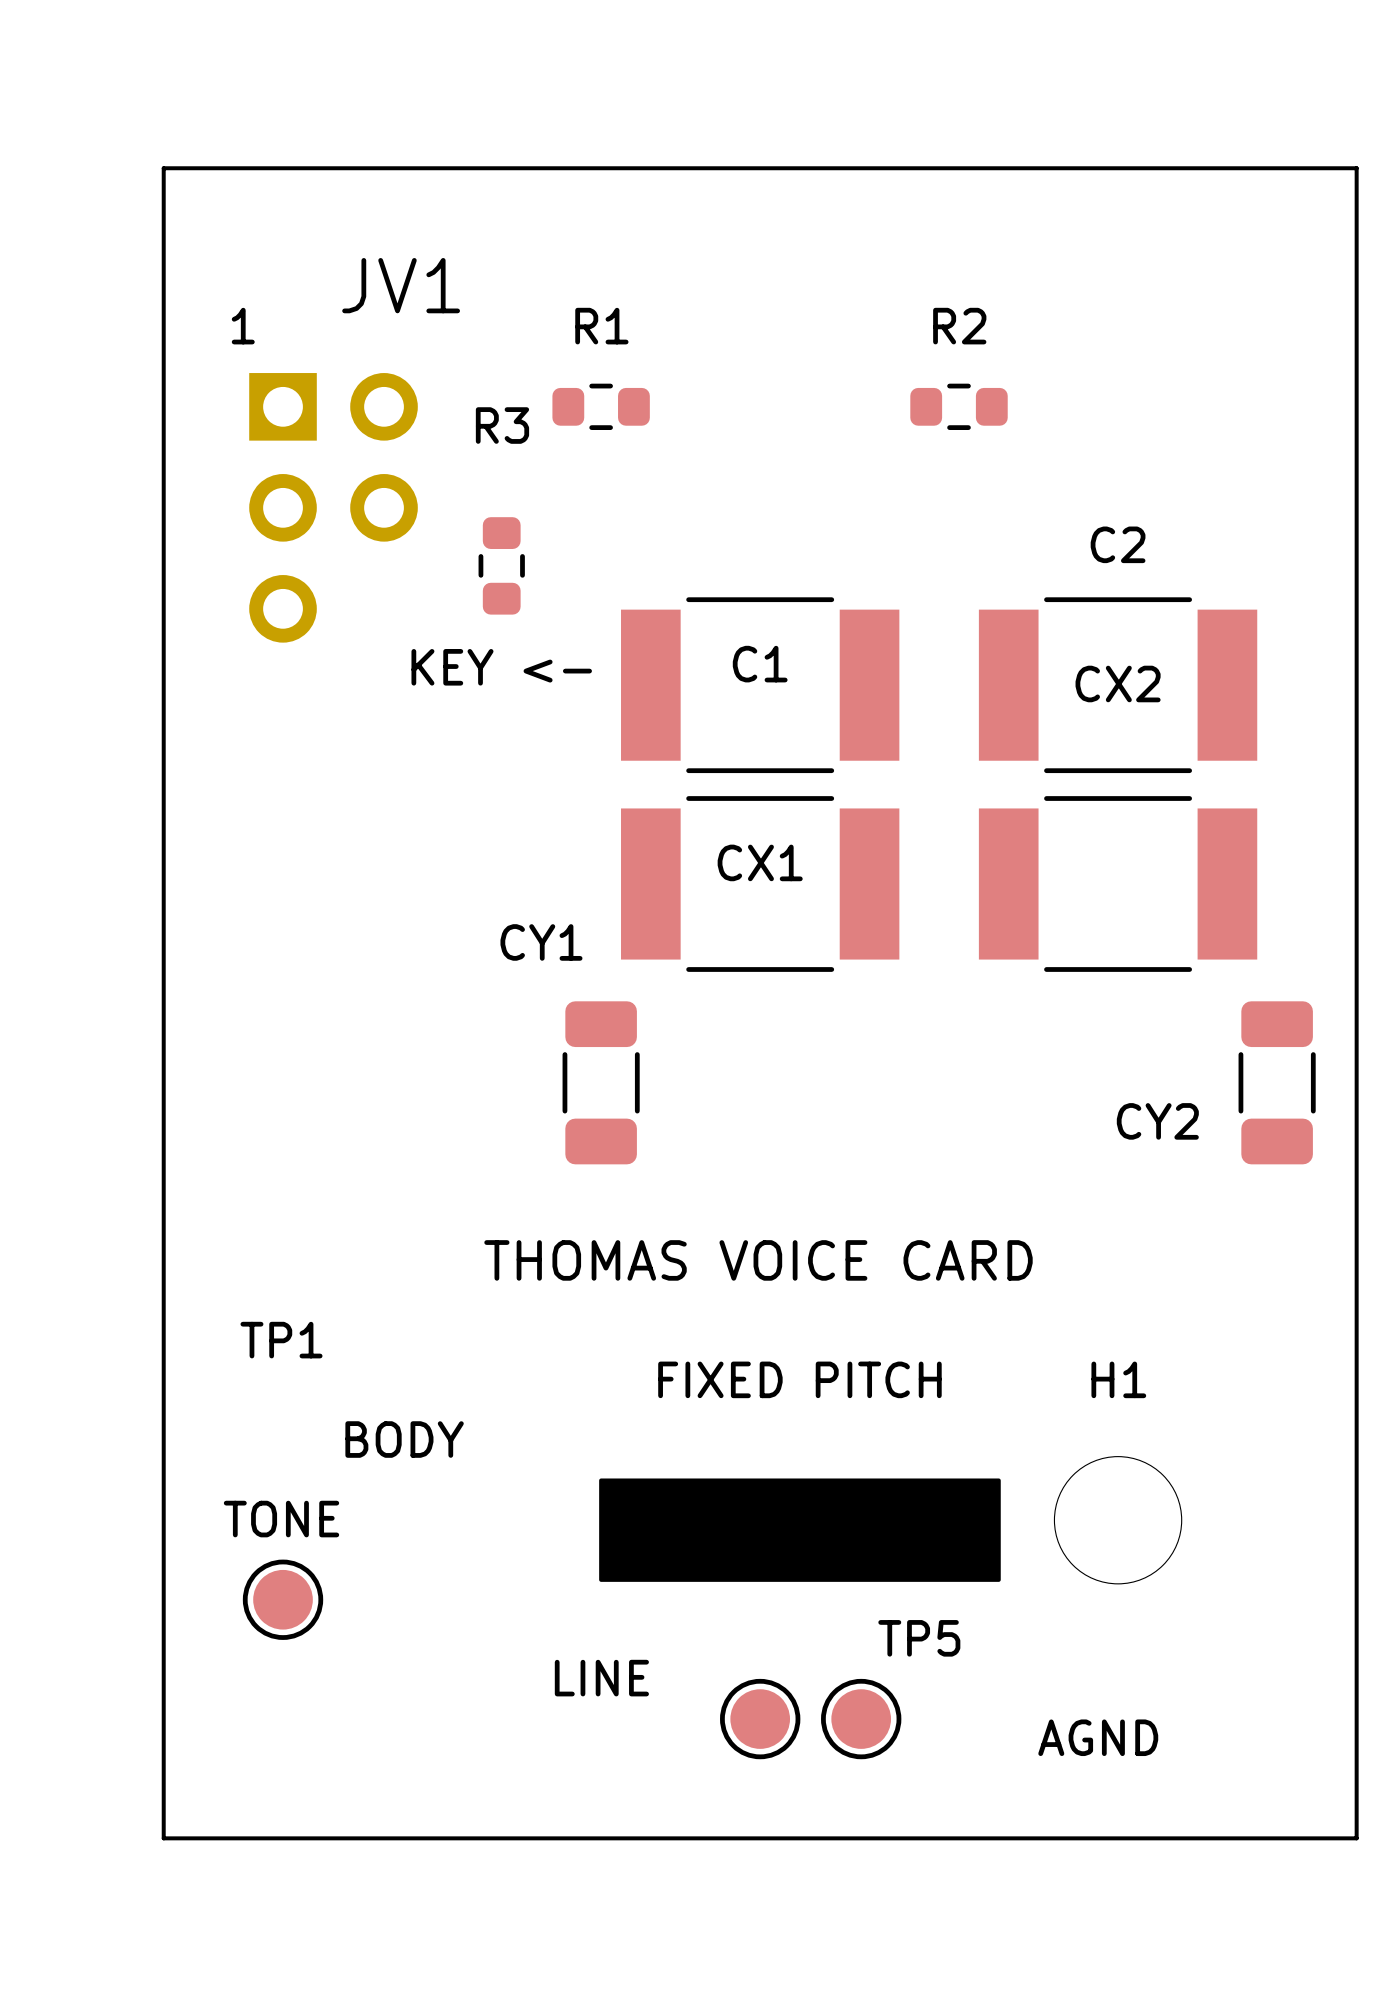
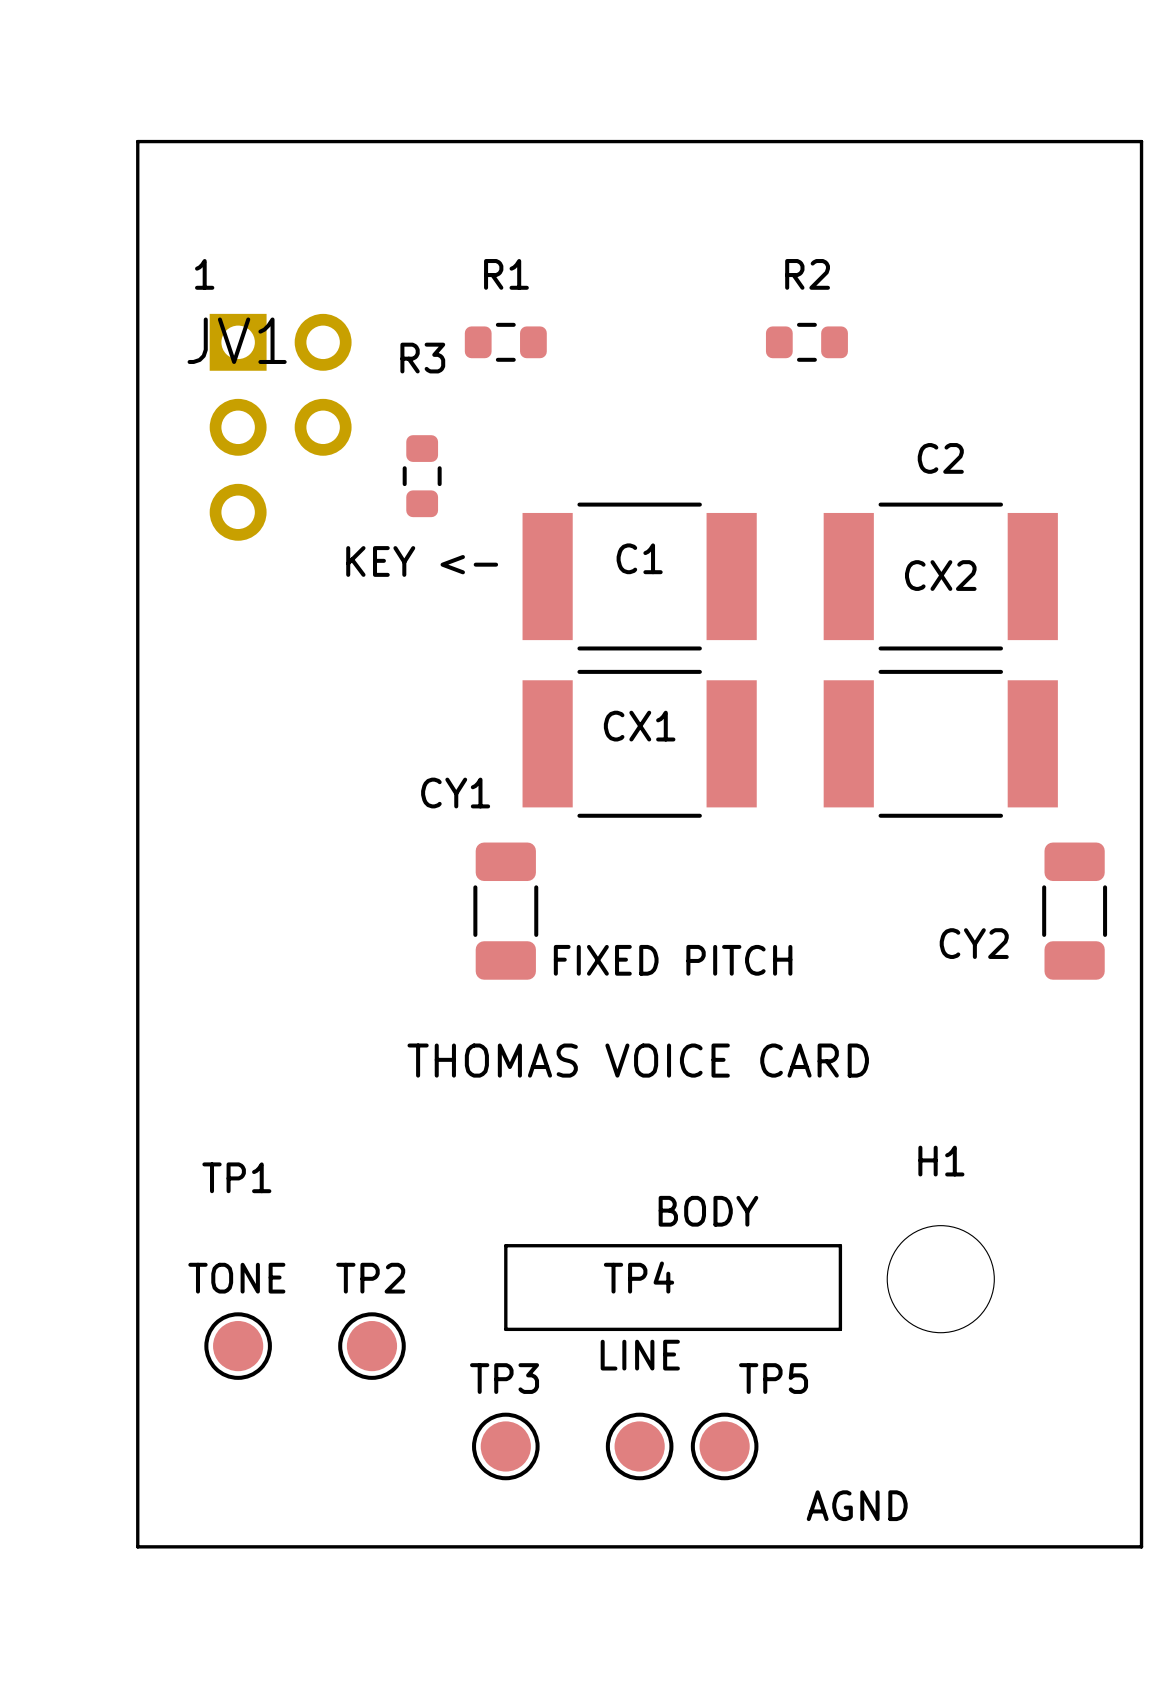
JV1 name position: JV1 (401, 285) -> JV1 (237, 340)
TP1 name position: TP1 (281, 1340) -> TP1 (236, 1177)
text position: FIXED PITCH (799, 1379) -> FIXED PITCH (673, 960)
text position: BODY (404, 1439) -> BODY (708, 1211)
drawing: [599, 1478, 1001, 1582] -> none
line: none -> (505, 1245) (505, 1329) (840, 1329) (840, 1245) (505, 1245)
TP4 name: none -> TP4 (639, 1277)
TP2: none -> (371, 1346)
text position: LINE (601, 1678) -> LINE (640, 1355)
TP3: none -> (505, 1446)
text position: AGND (1098, 1737) -> AGND (857, 1505)

